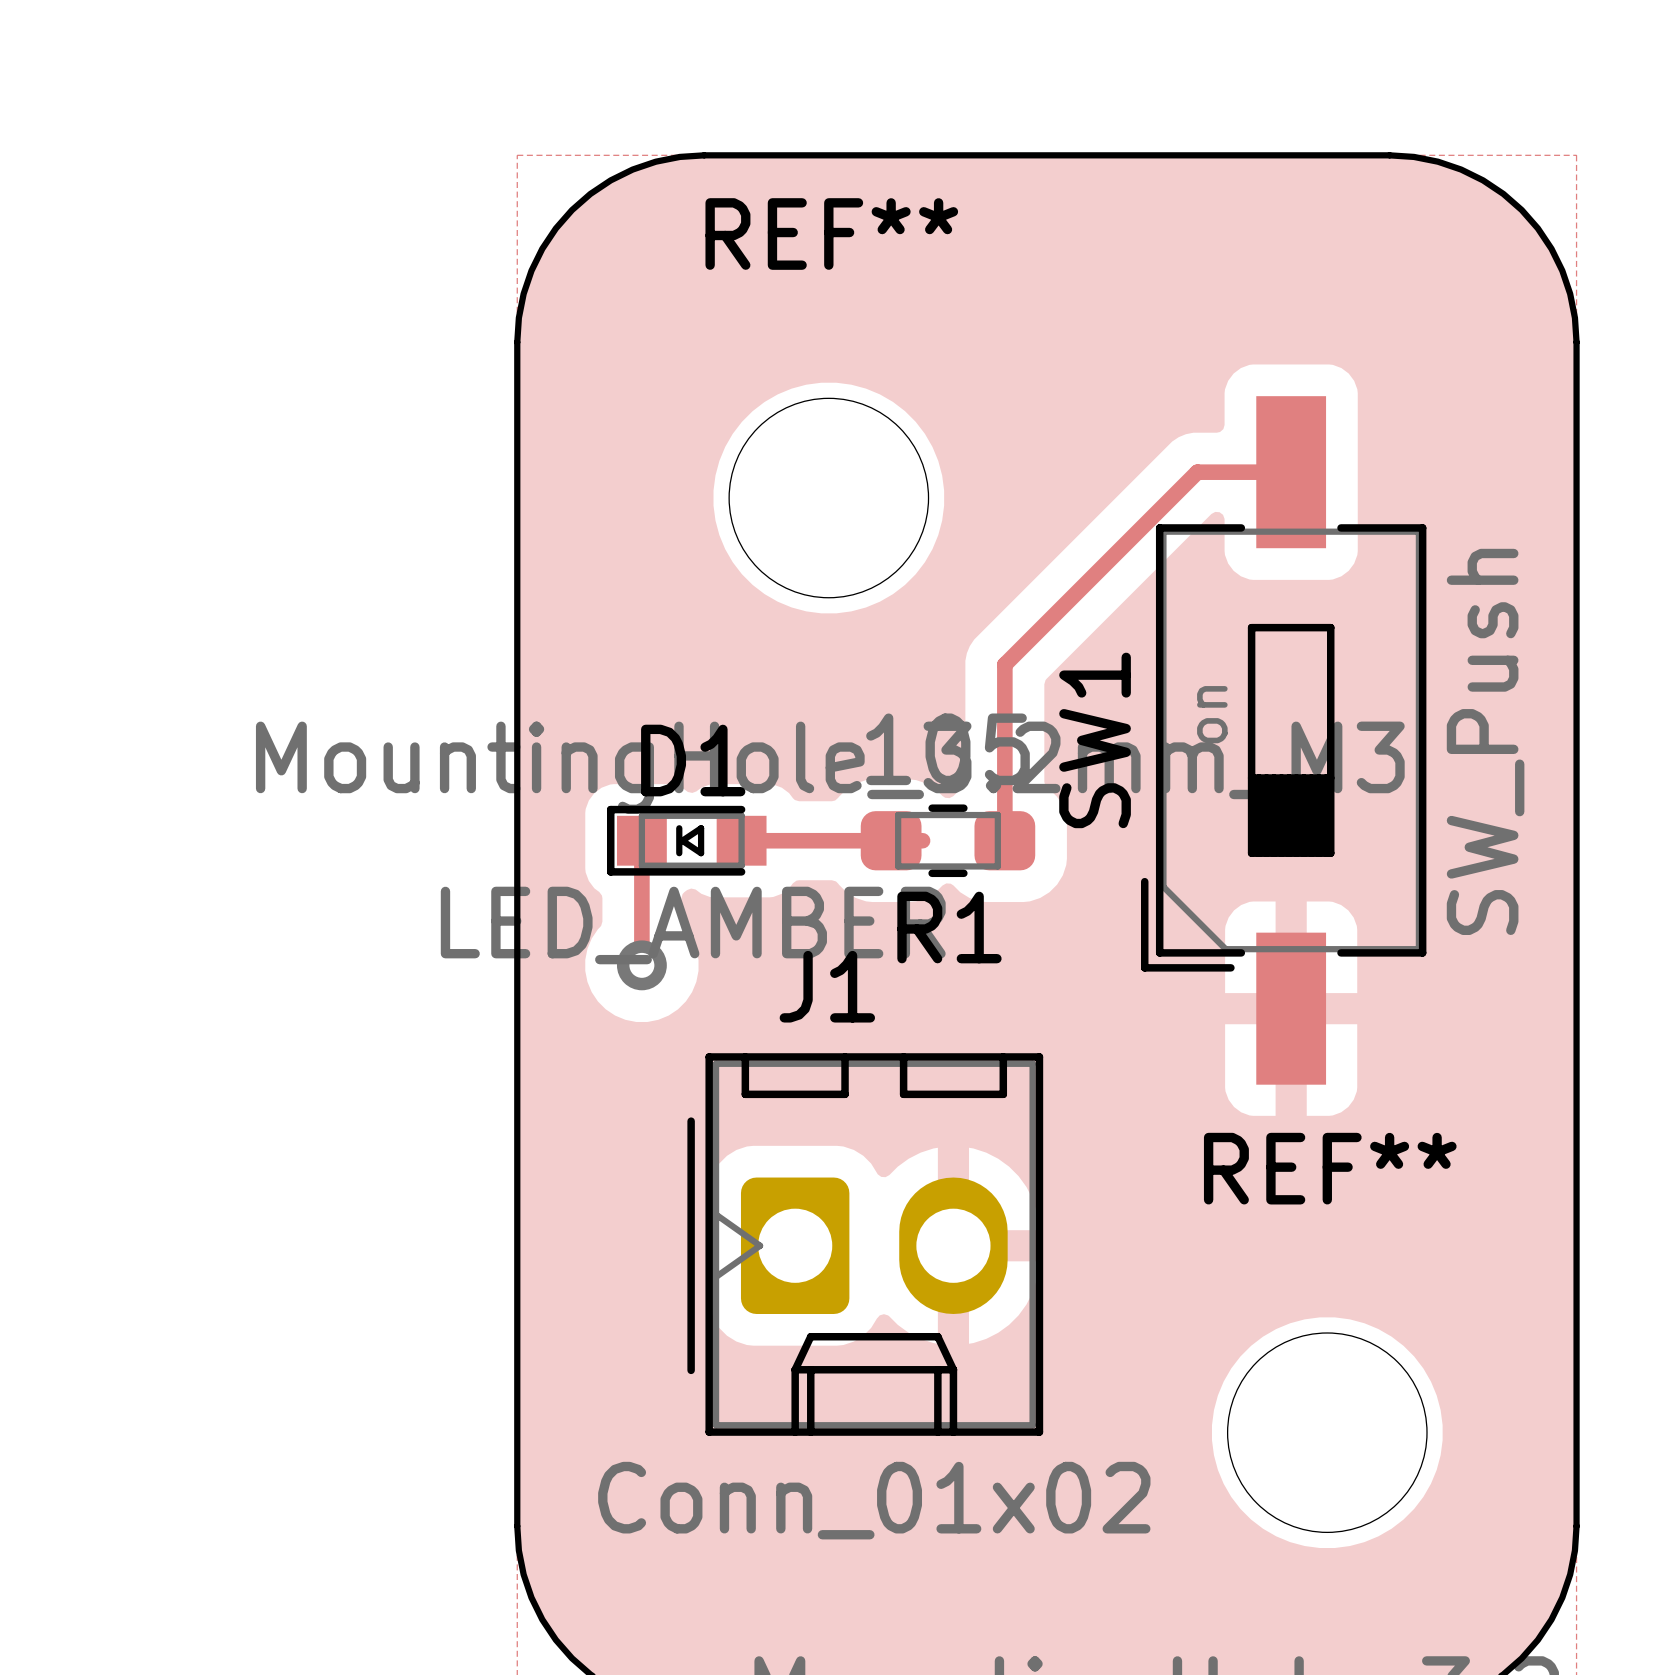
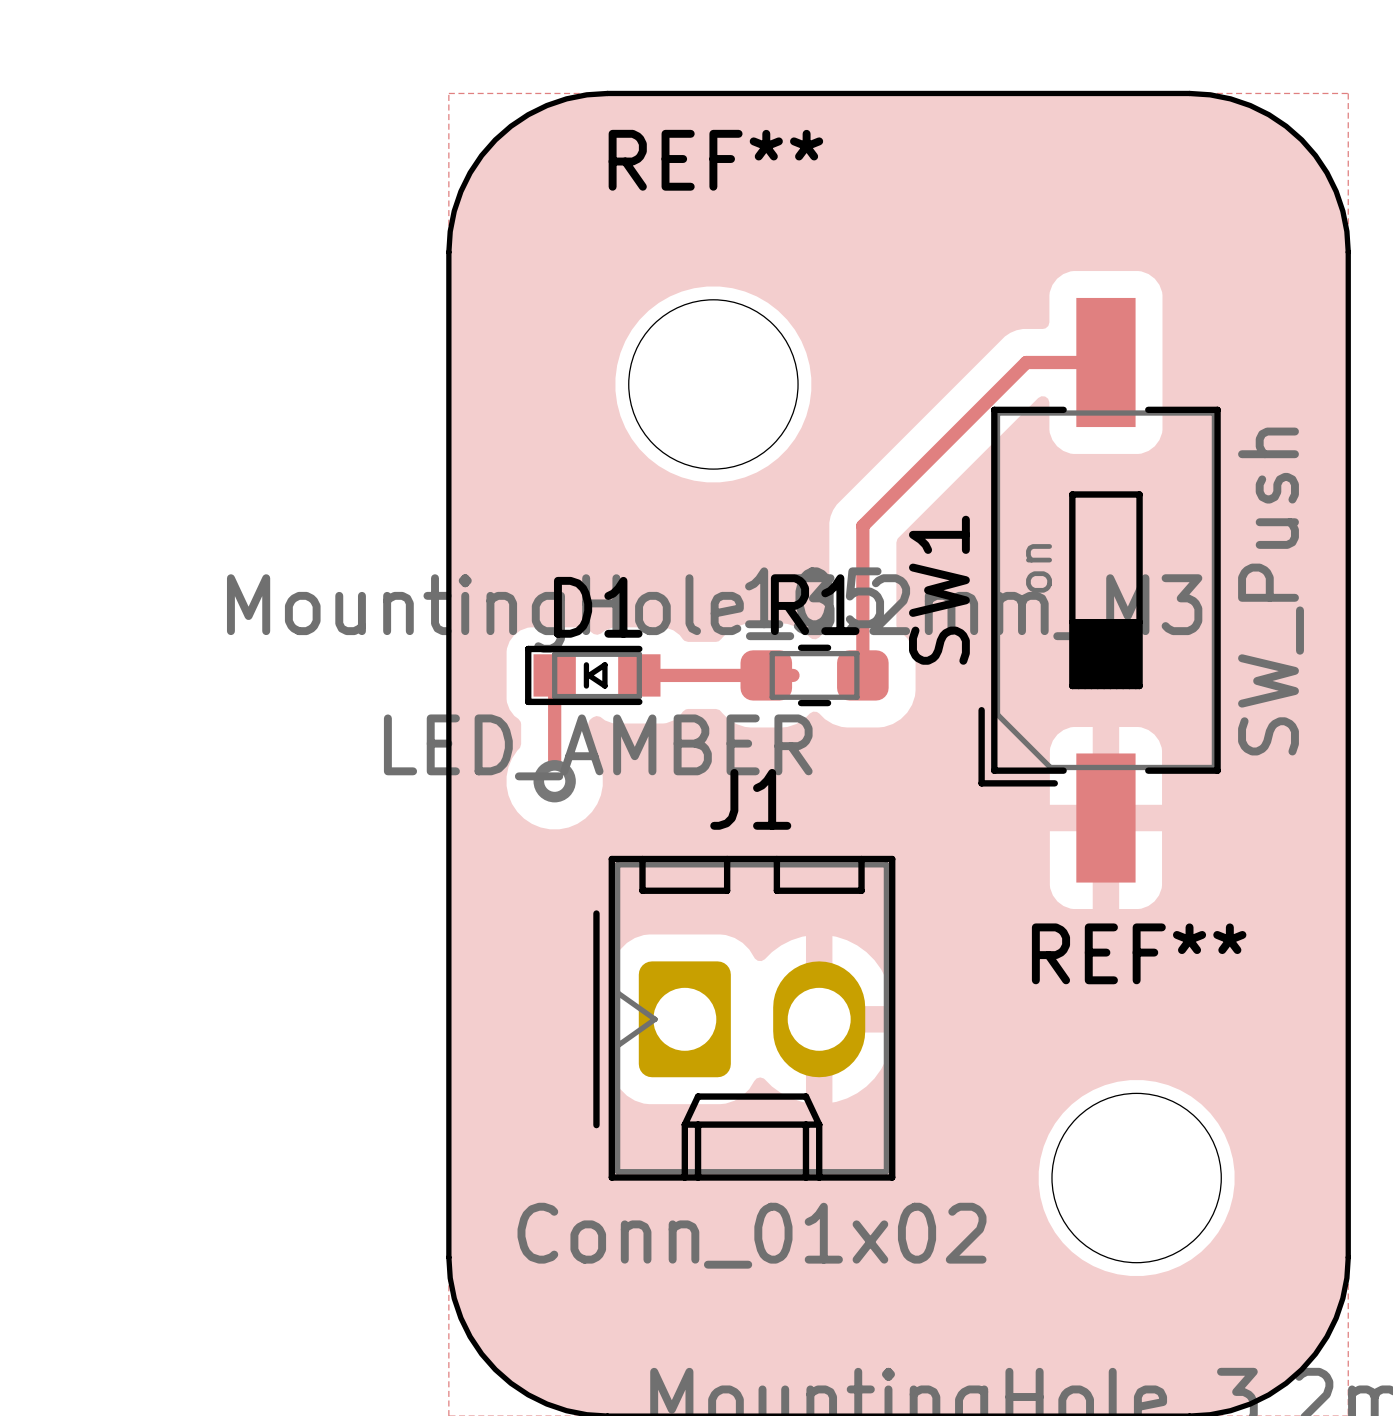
R1 name position: R1 (949, 927) -> R1 (815, 604)
J1 name position: J1 (827, 986) -> J1 (750, 799)

